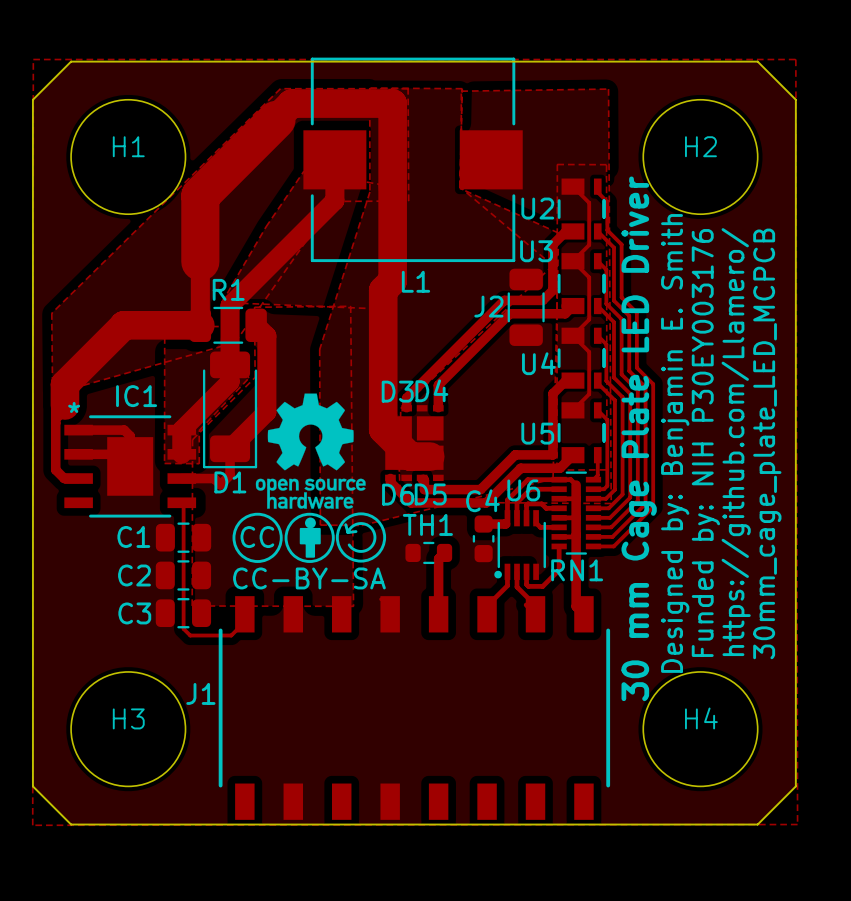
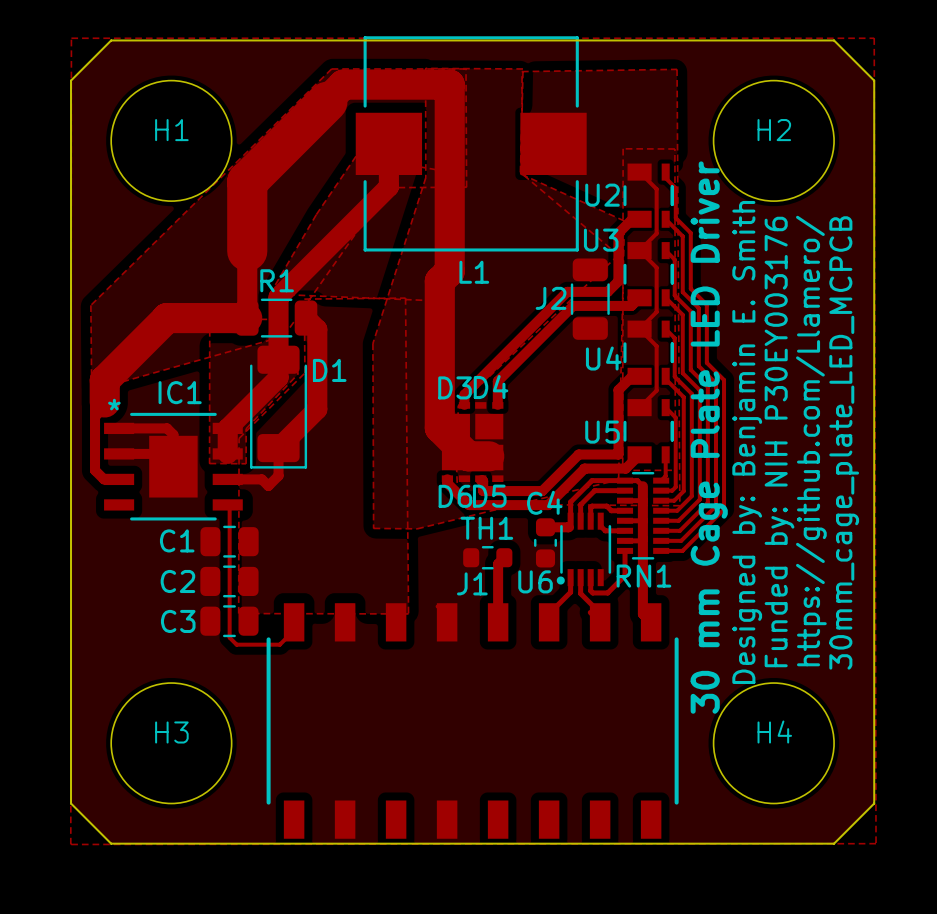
drawing: [232, 393, 387, 563] -> none
D1 name position: D1 (230, 482) -> D1 (329, 370)
U6 name position: U6 (523, 490) -> U6 (535, 581)
J1 name position: J1 (200, 693) -> J1 (472, 583)

